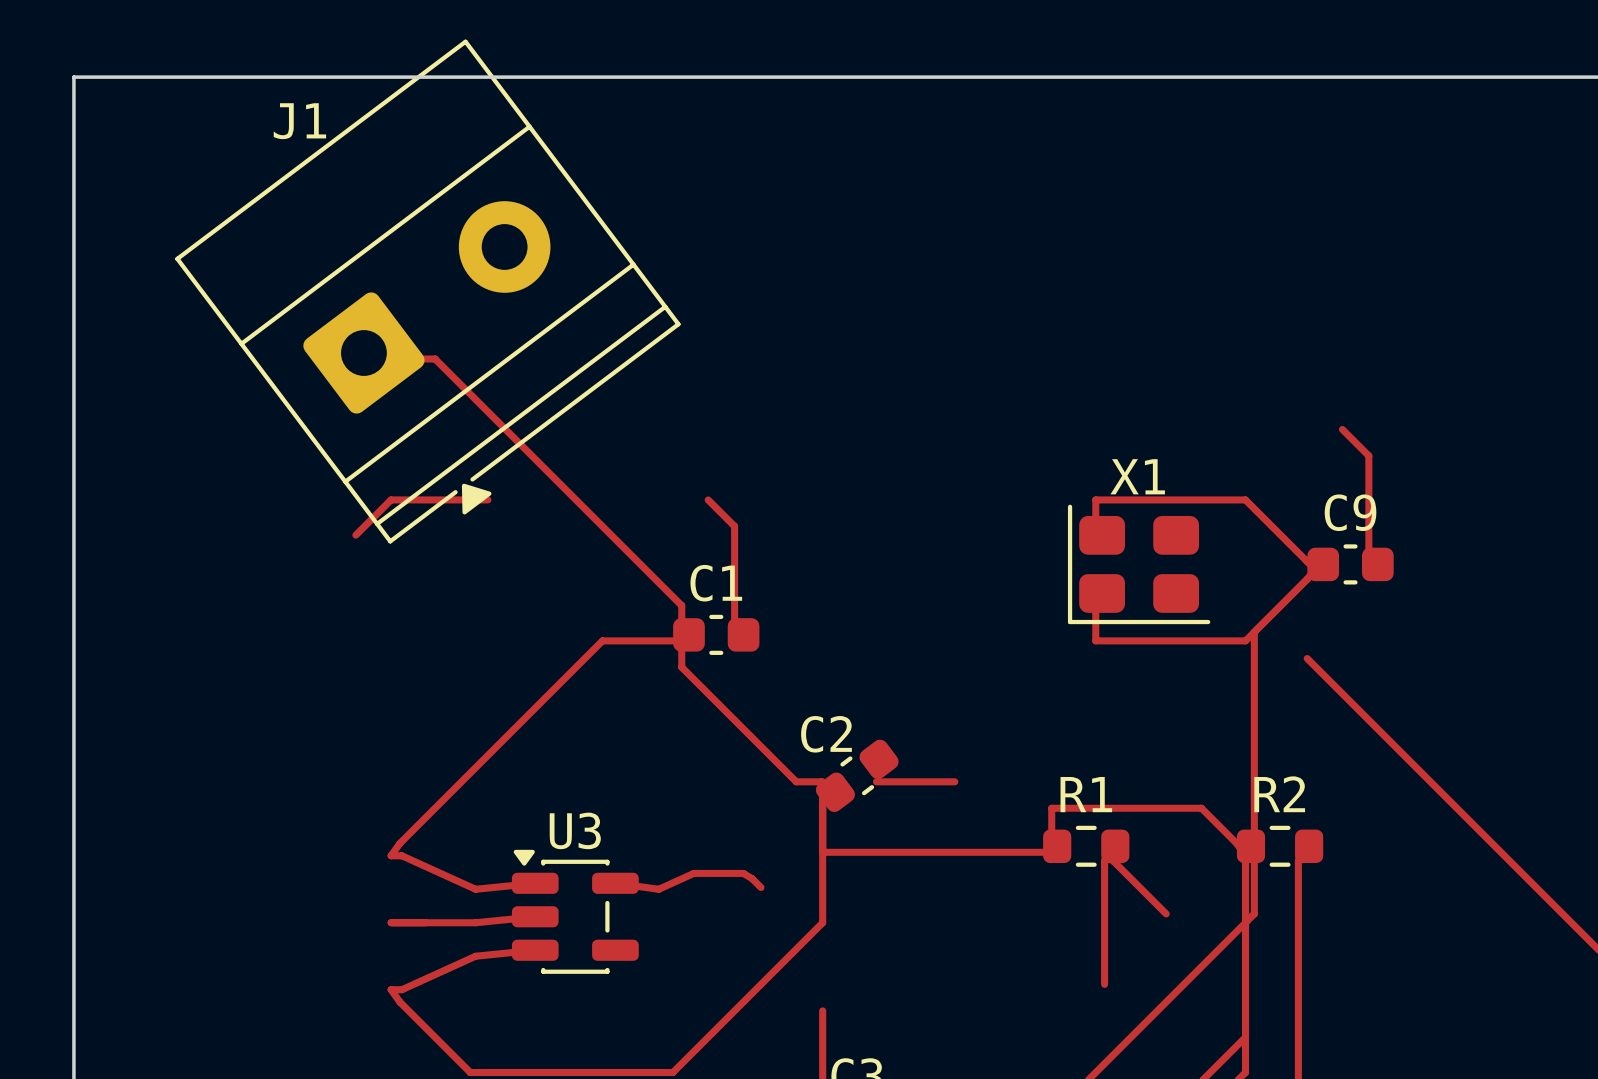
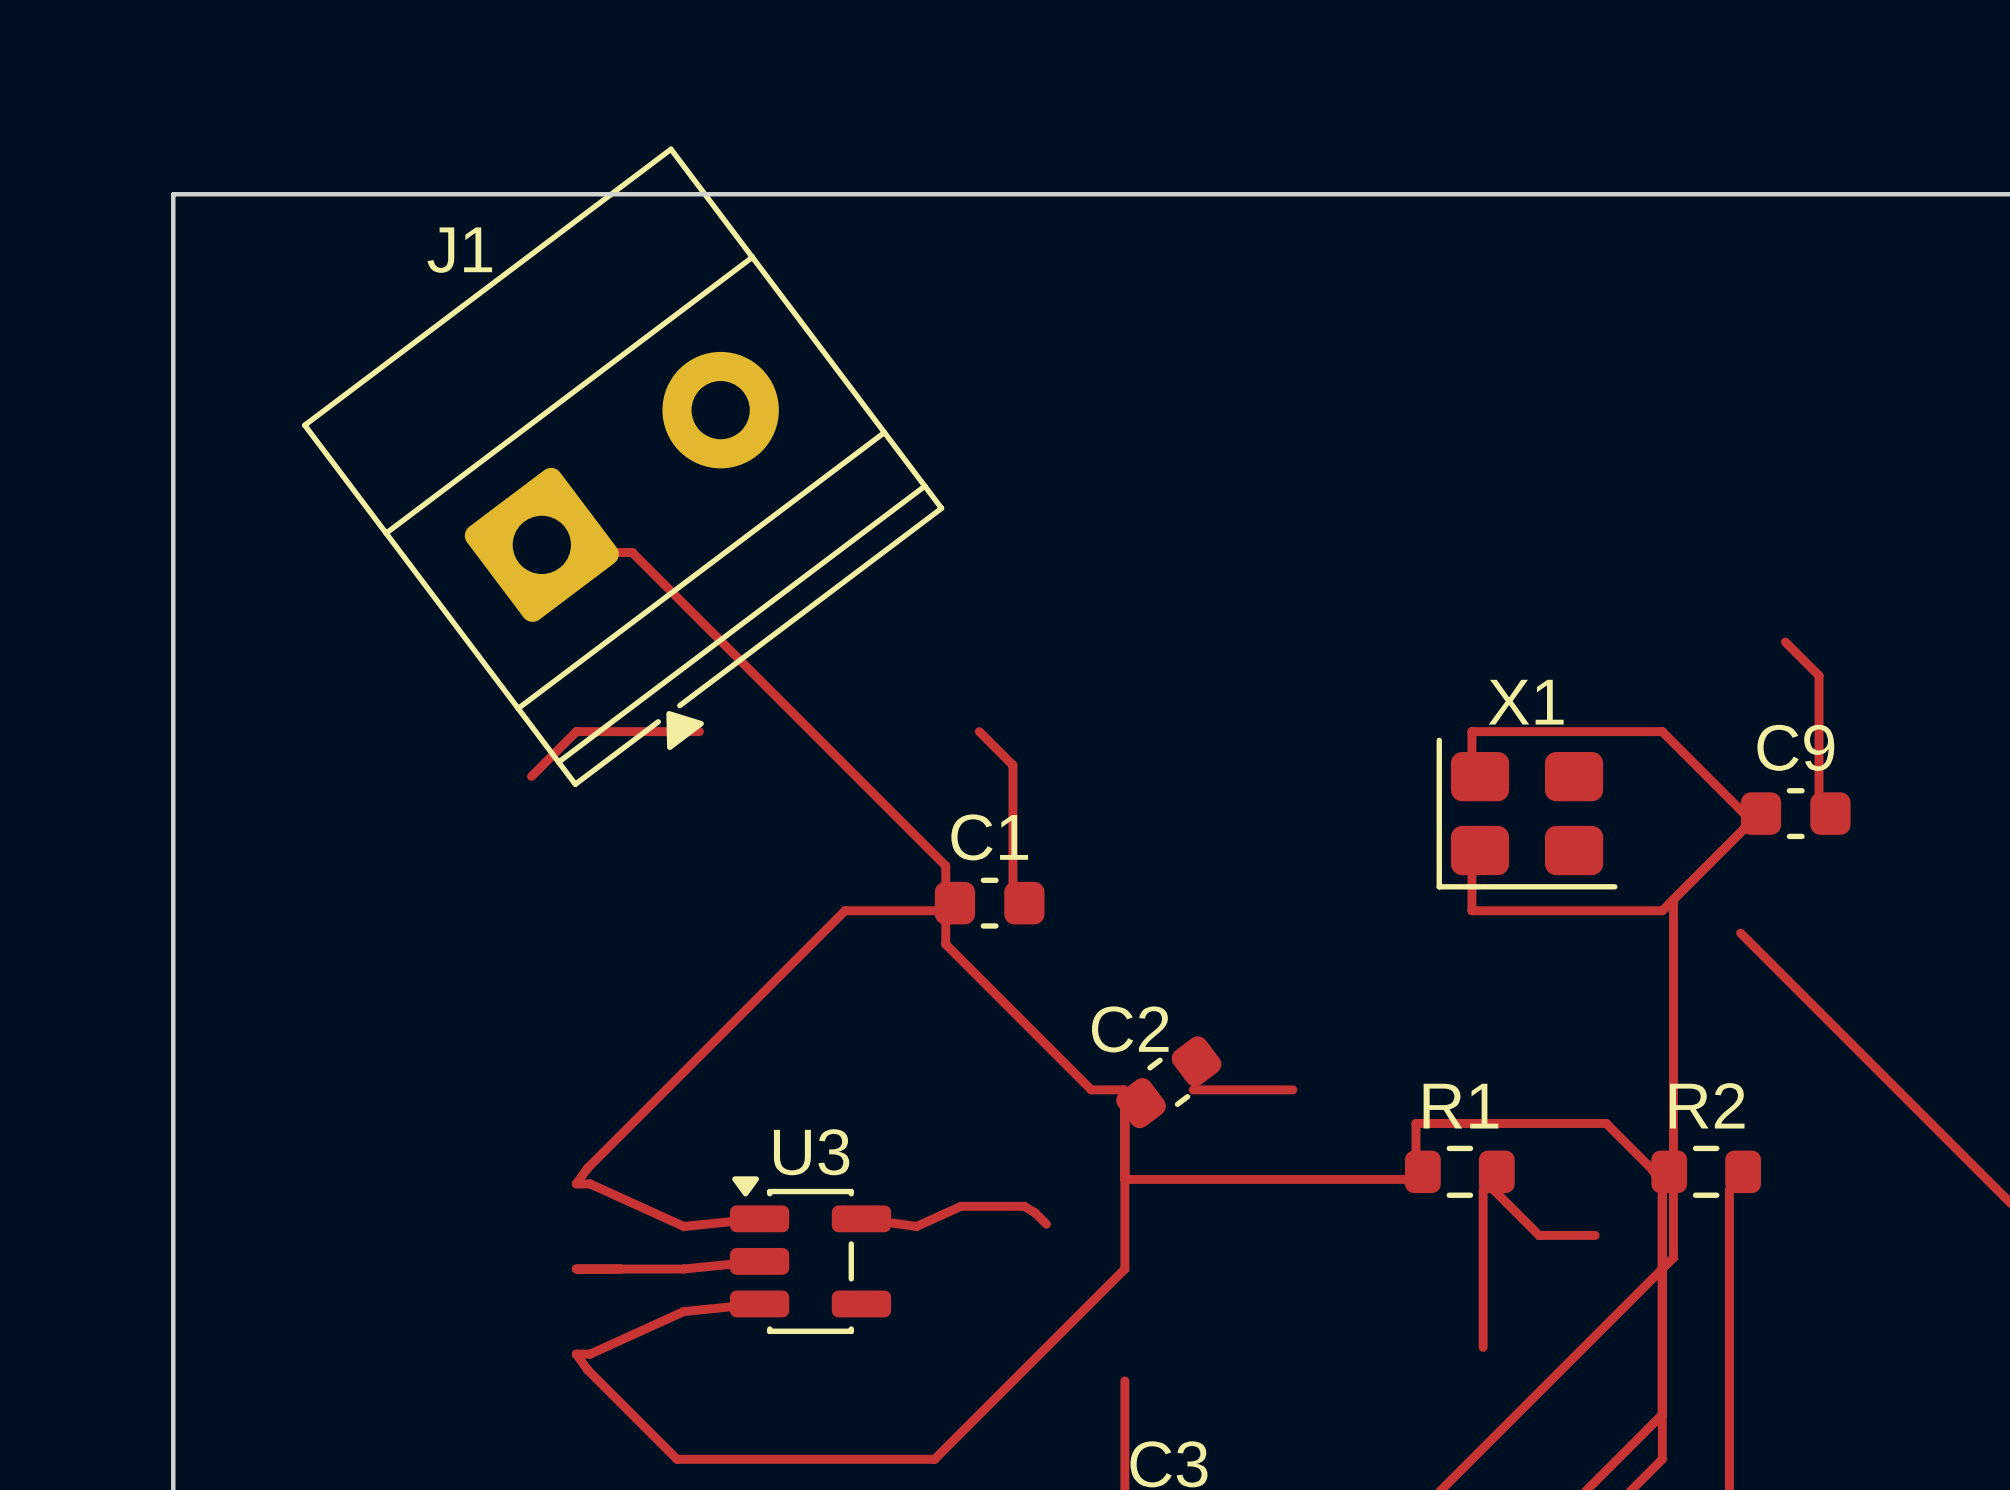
track: (1148, 896) (1166, 913) -> (1539, 1235) (1595, 1235)

